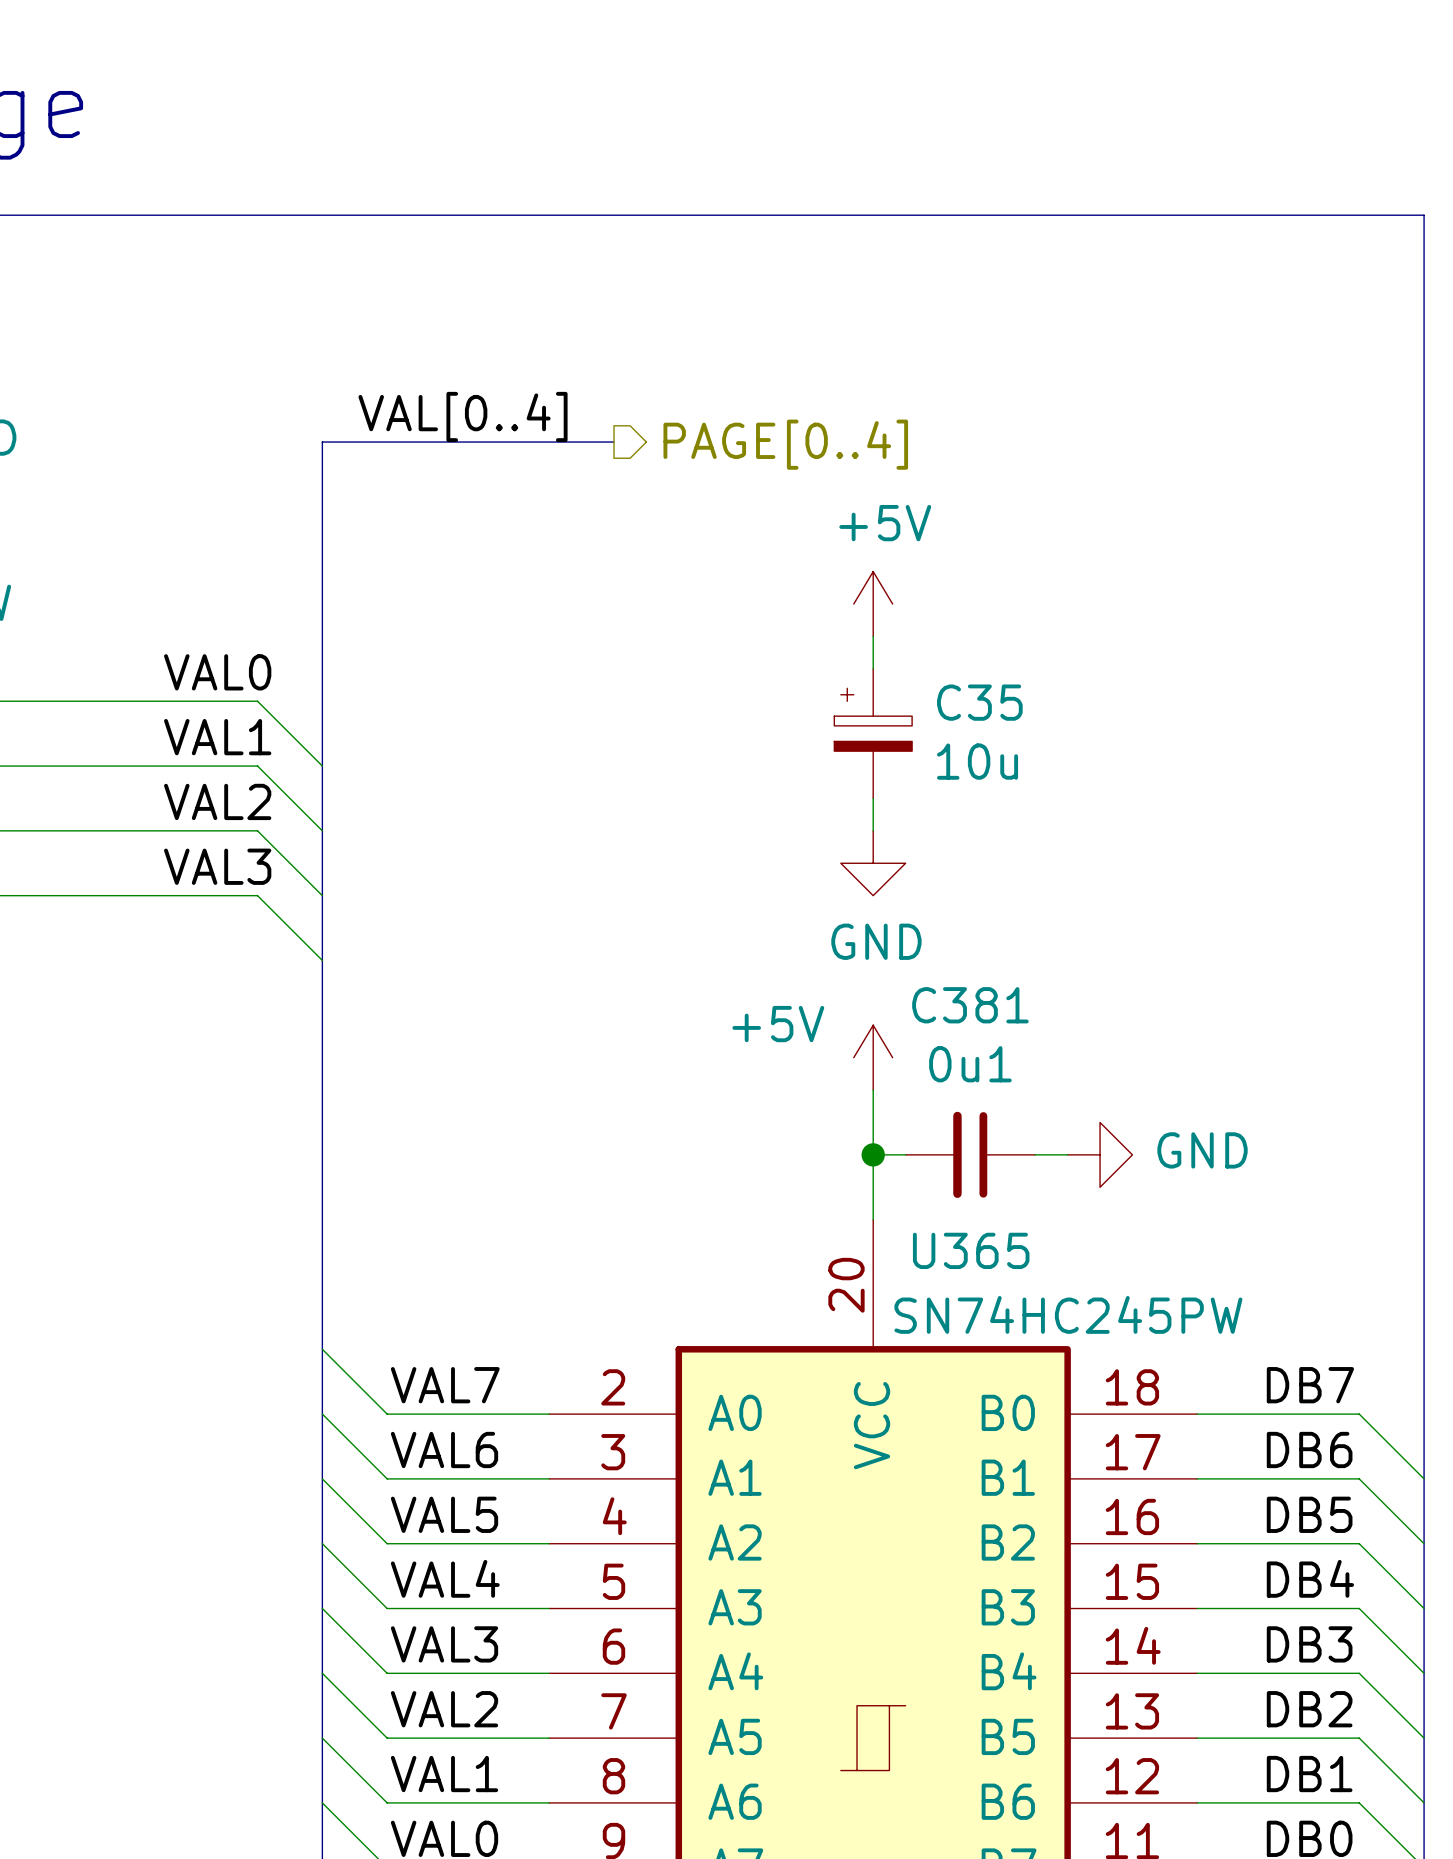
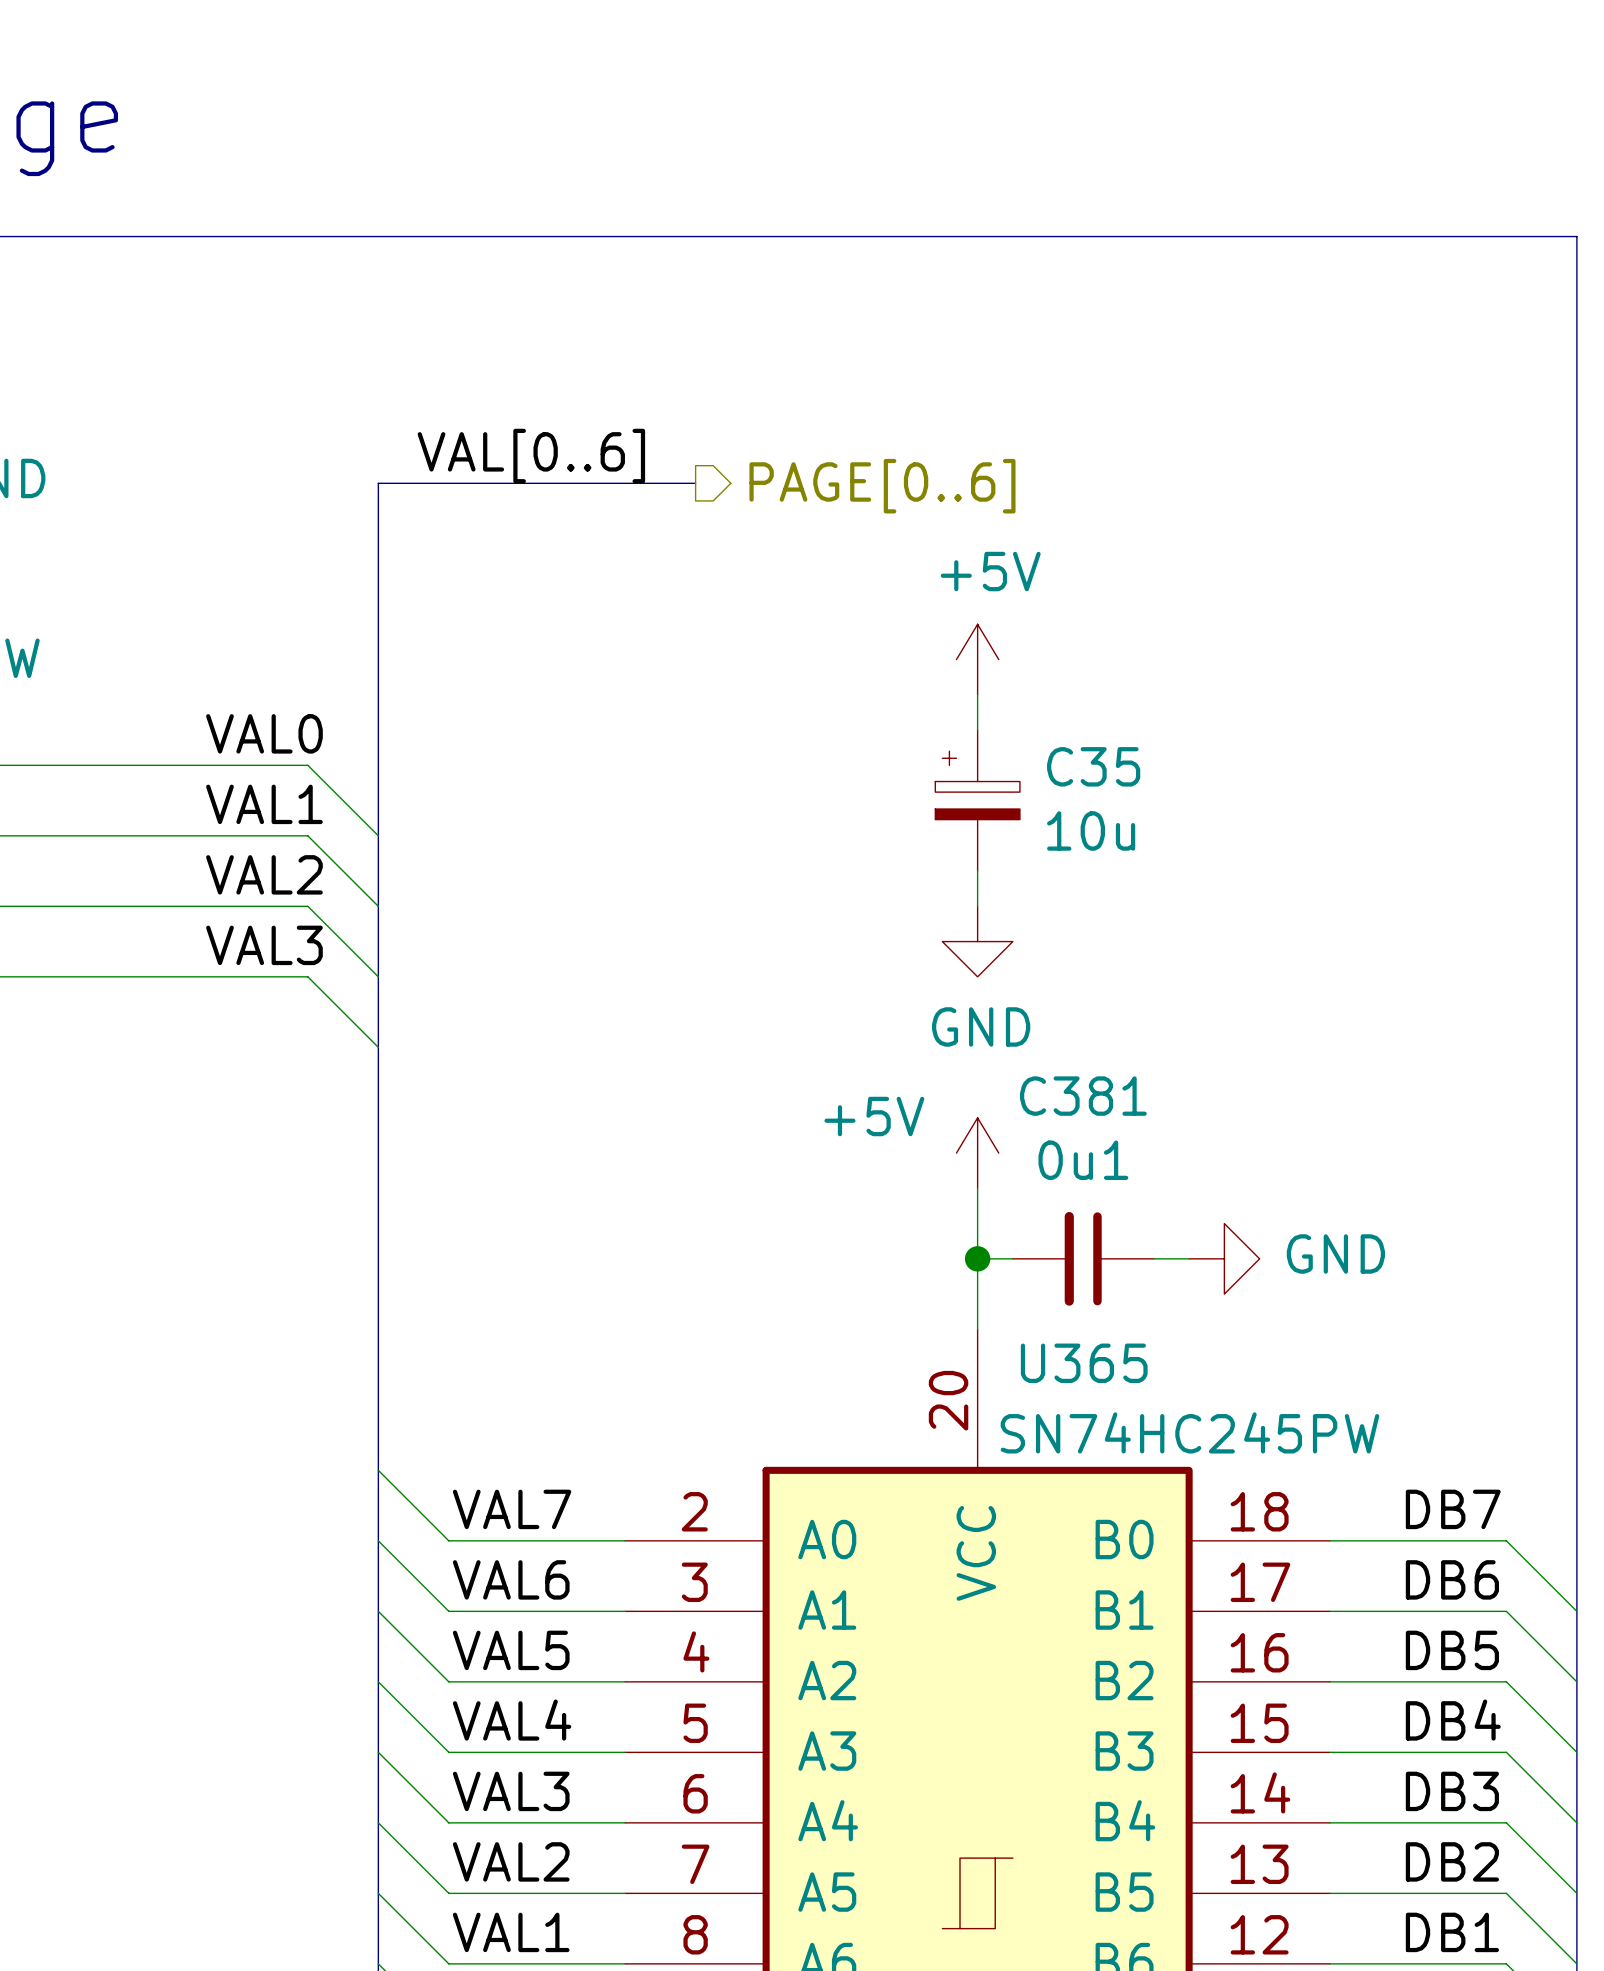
label: VAL[0..4] (463, 416) -> VAL[0..6] (531, 456)
hierarchical label: PAGE[0..4] (785, 444) -> PAGE[0..6] (882, 486)

